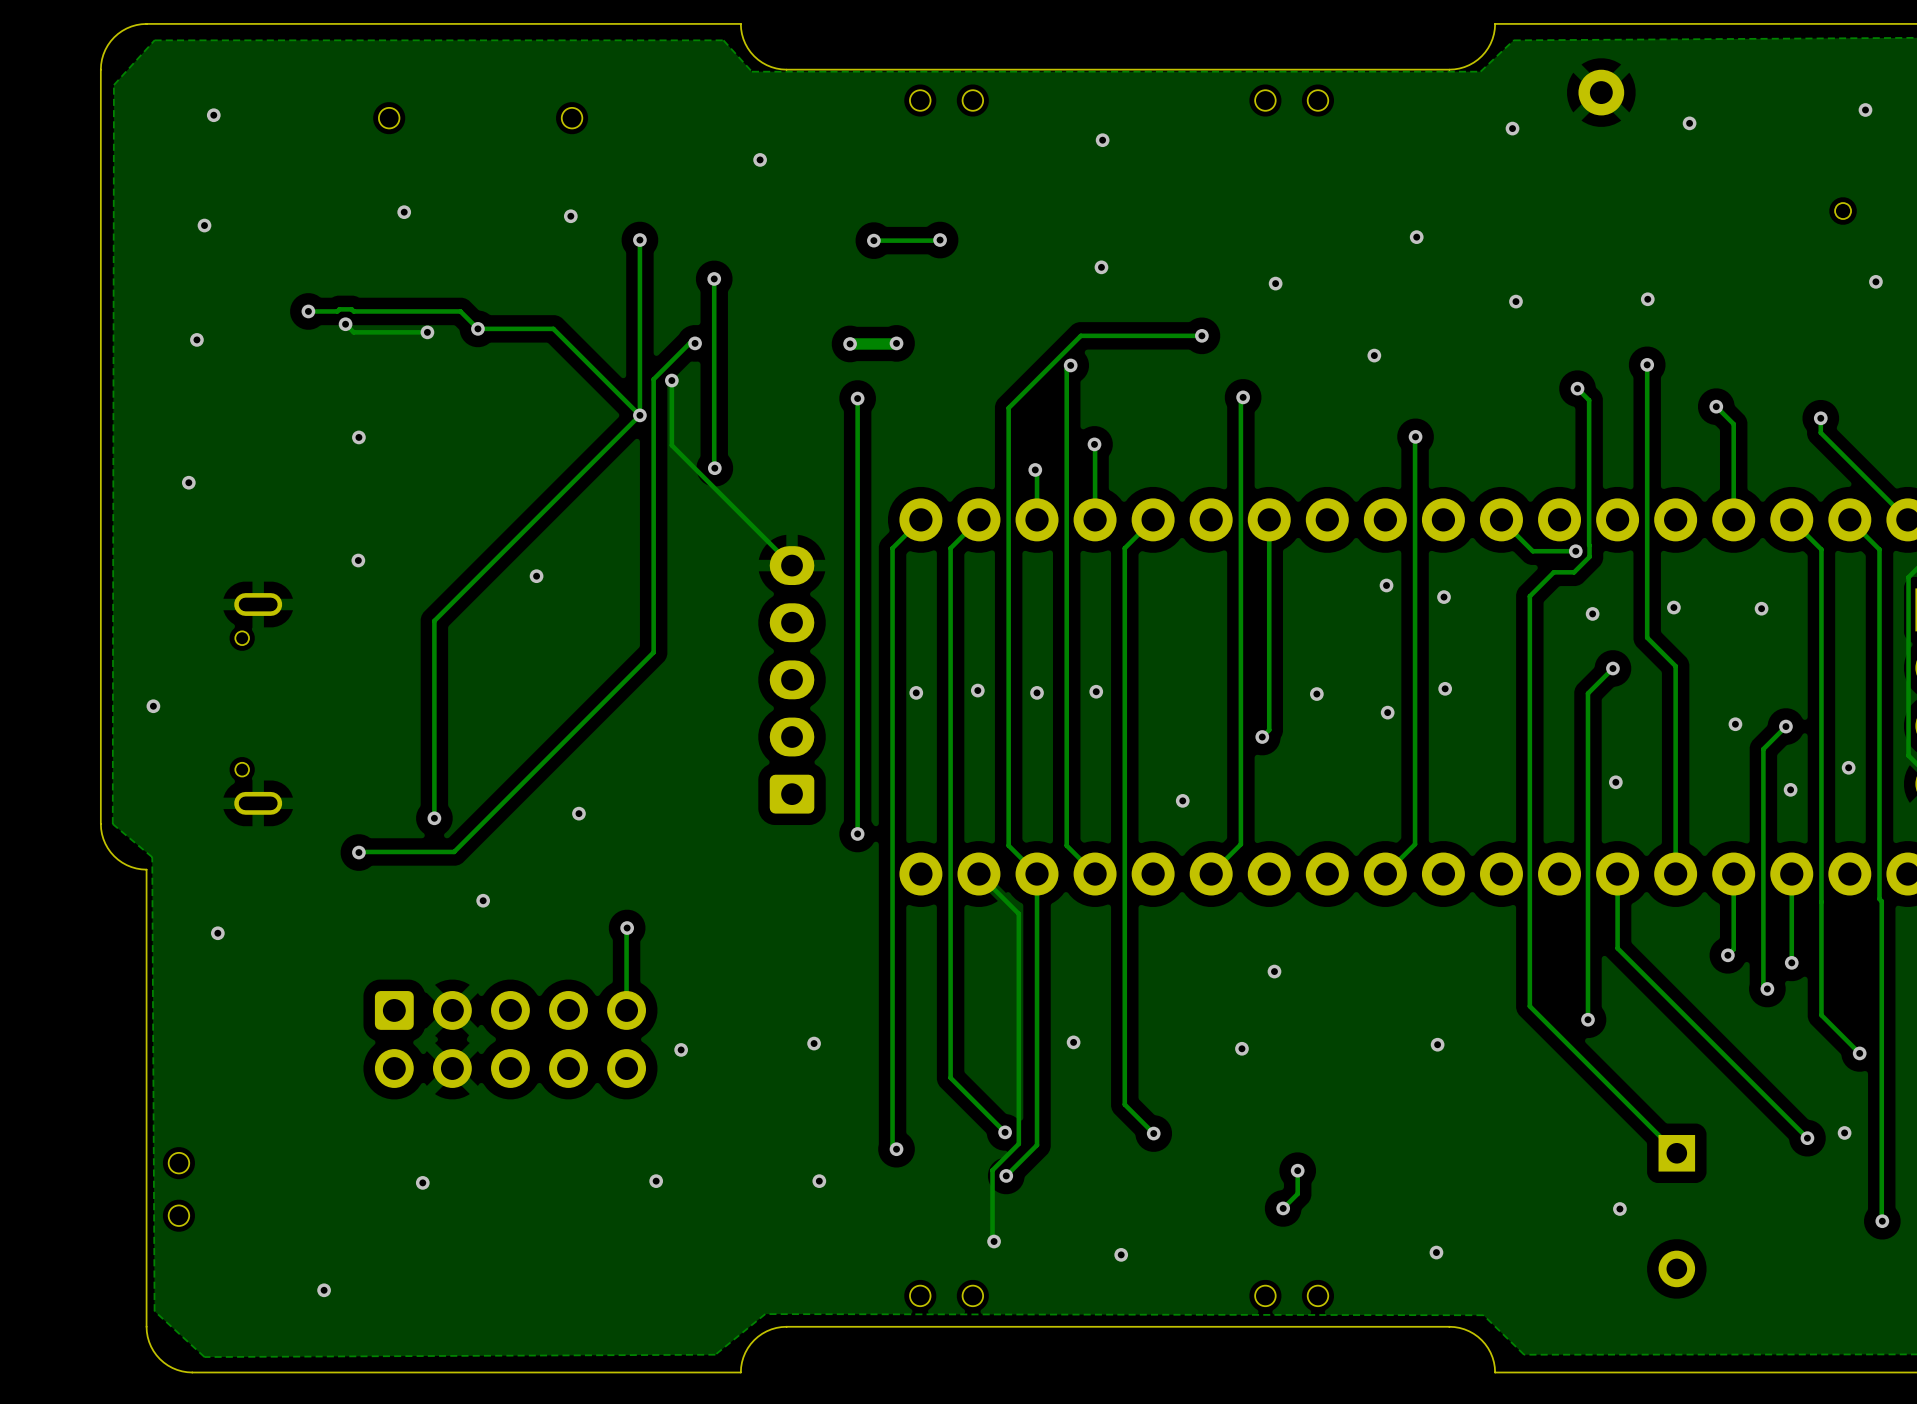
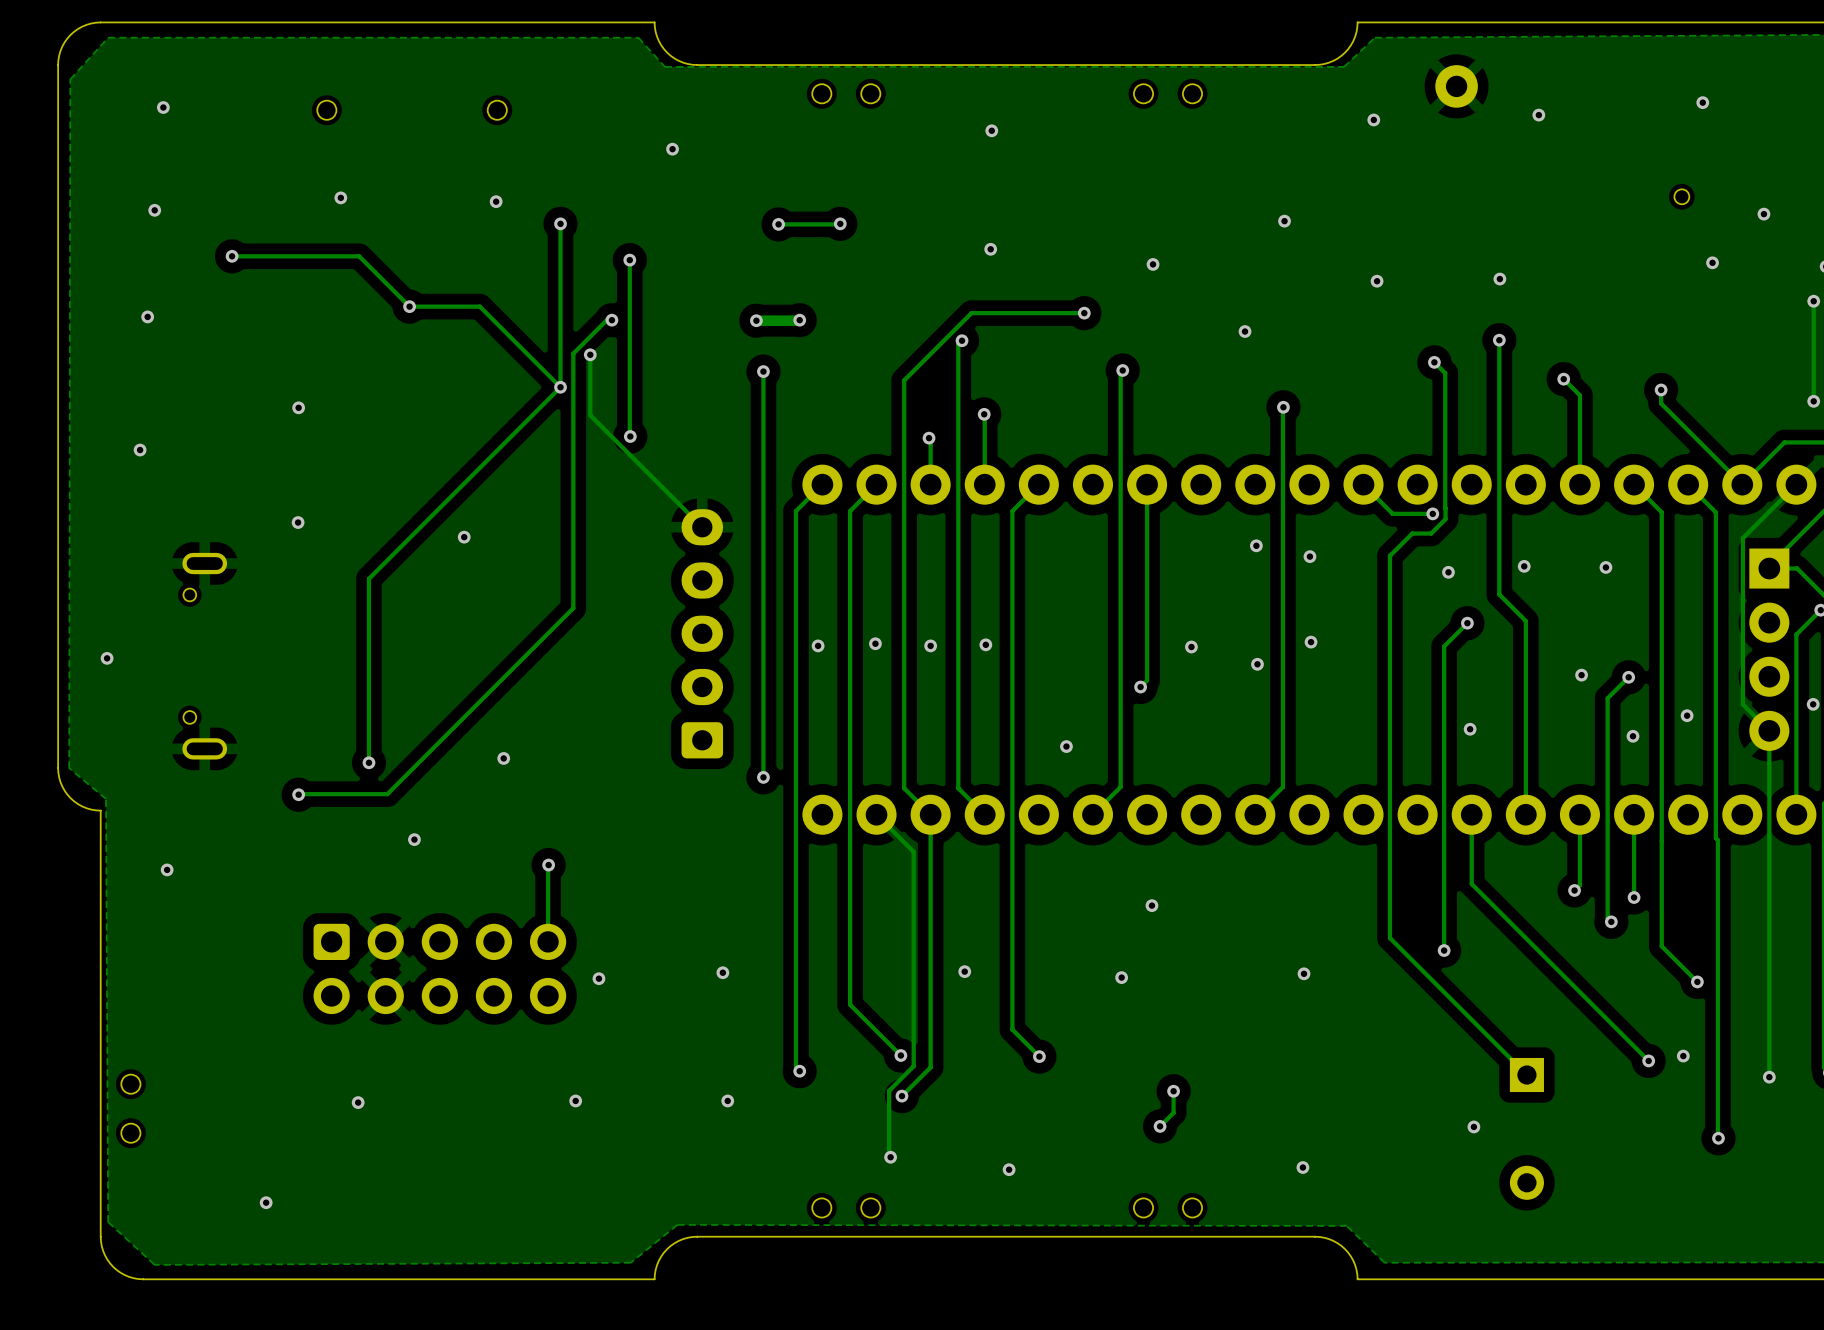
via: none -> (232, 256)
via: (308, 311) -> none
track: (460, 311) (353, 311) (351, 309) (308, 311) -> (393, 290) (359, 256) (232, 256)
track: (345, 324) (353, 332) (427, 332) -> none
via: (345, 324) -> none
via: (427, 332) -> none

